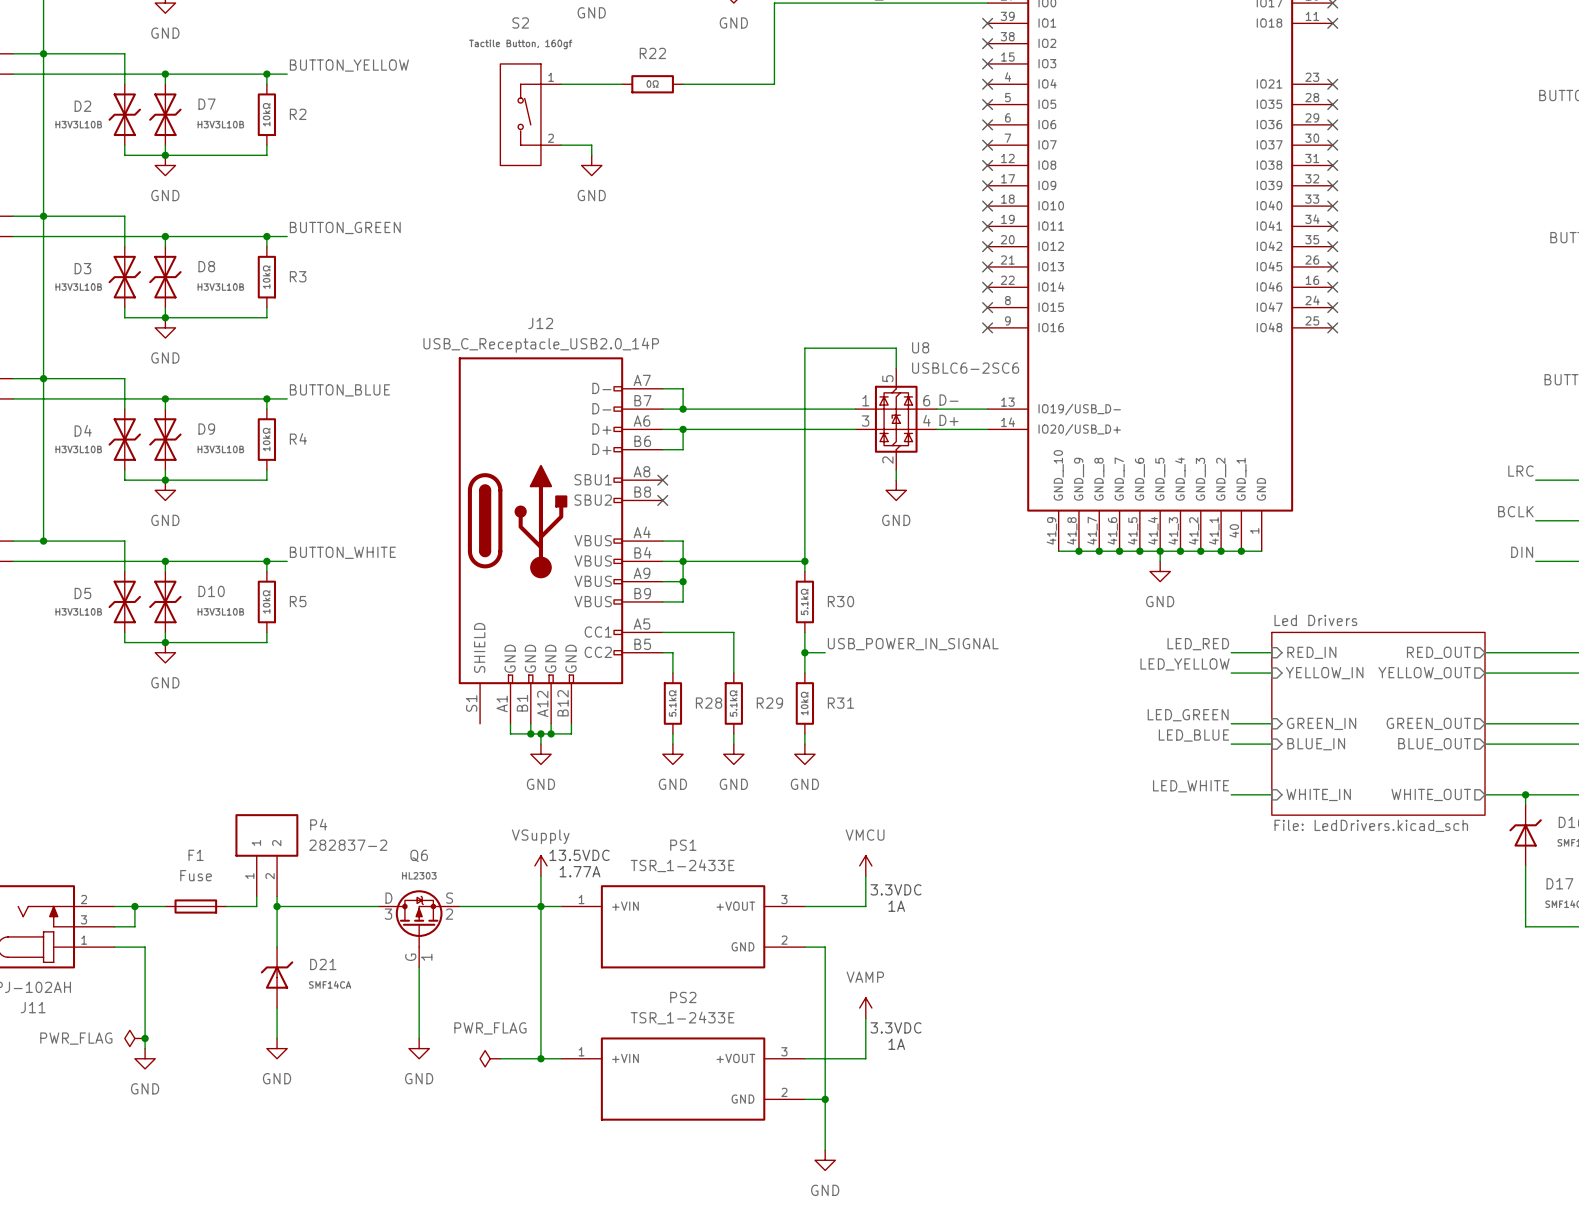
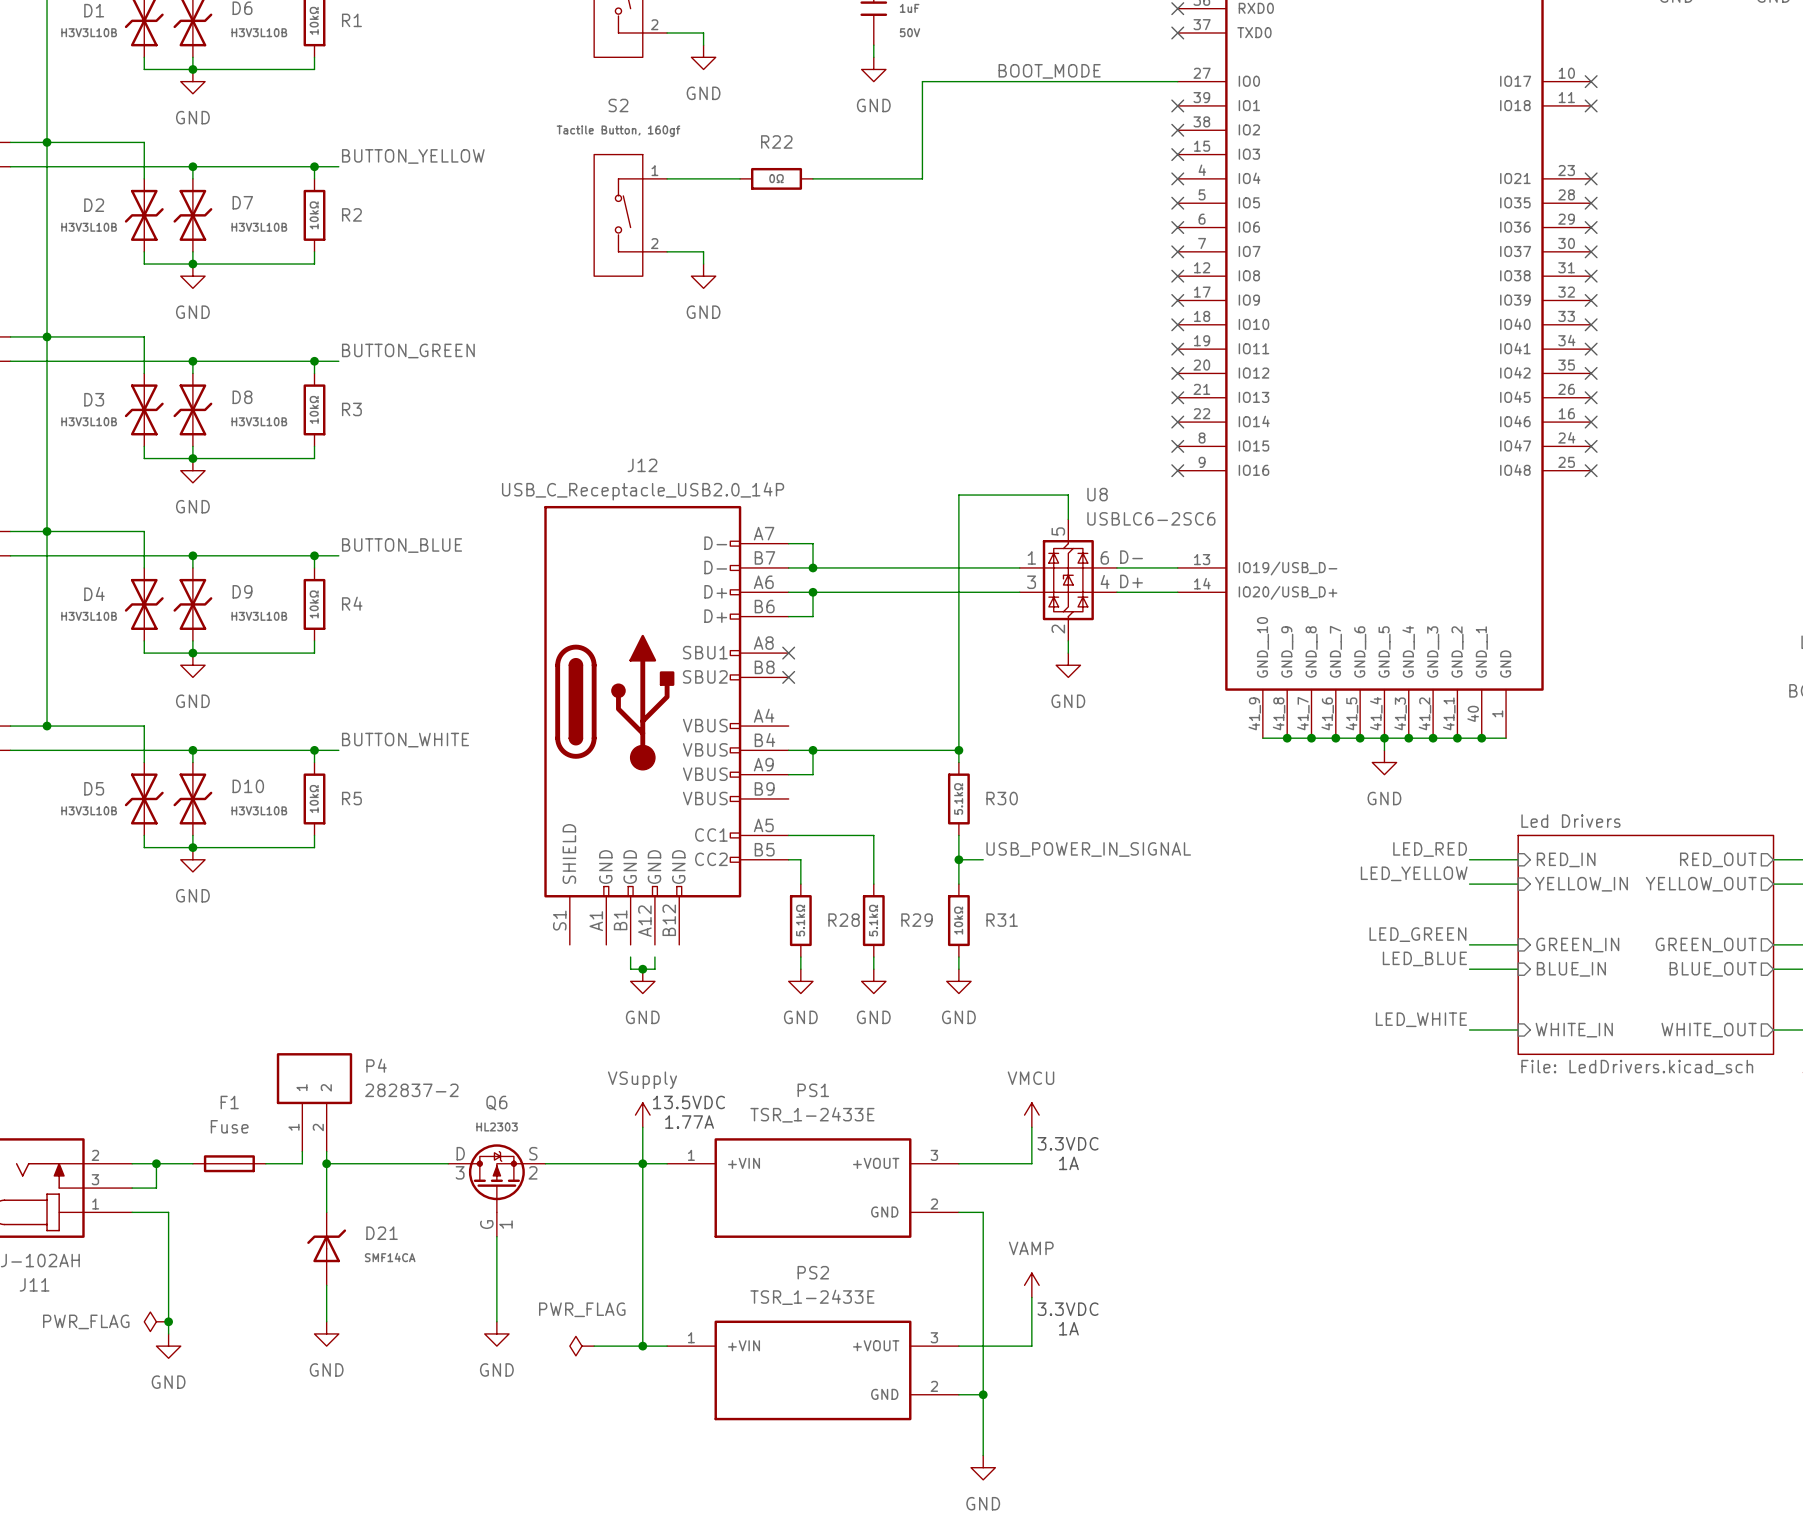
wire: (662, 541) (683, 541) (683, 561) -> none
wire: (683, 581) (683, 601) (662, 601) -> none
junction: (683, 581) -> none
wire: (510, 723) (510, 733) (571, 733) (571, 723) -> none
wire: (530, 723) (530, 733) -> (654, 957) (654, 969) (630, 969) (630, 957)
wire: (551, 723) (551, 733) -> none
junction: (530, 733) -> none
wire: (540, 733) (540, 744) -> none
junction: (540, 733) -> none
junction: (551, 733) -> none
junction: none -> (642, 969)

